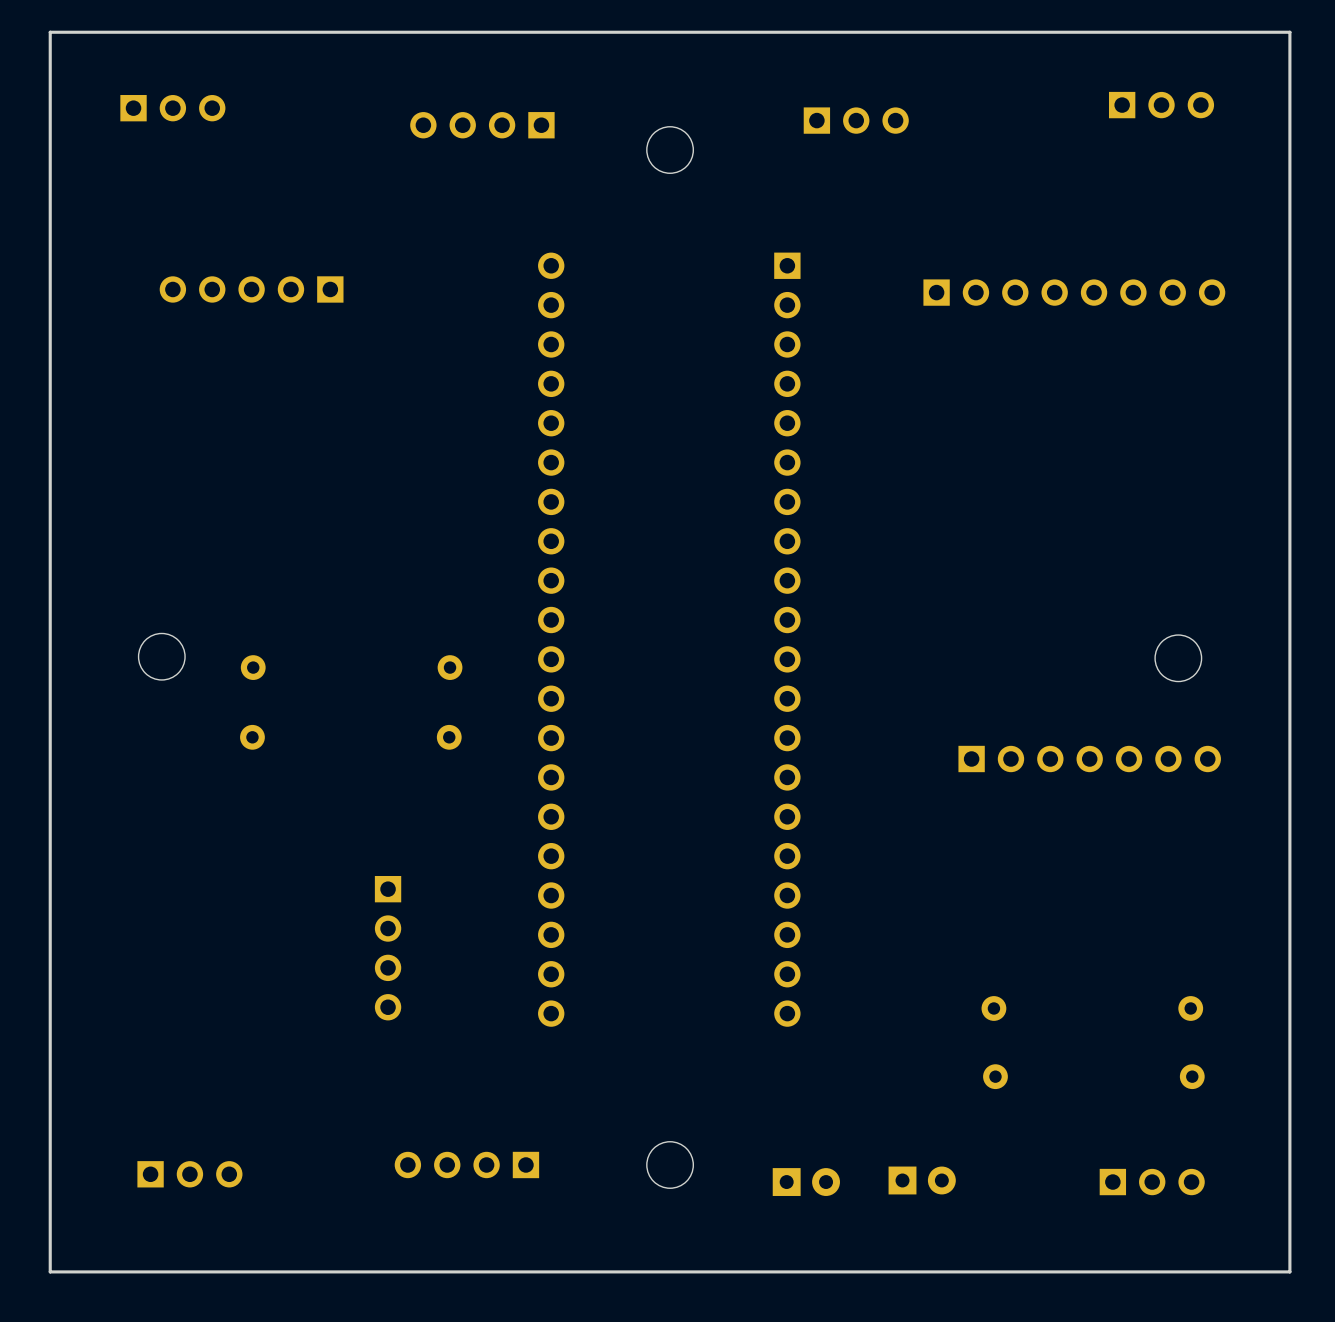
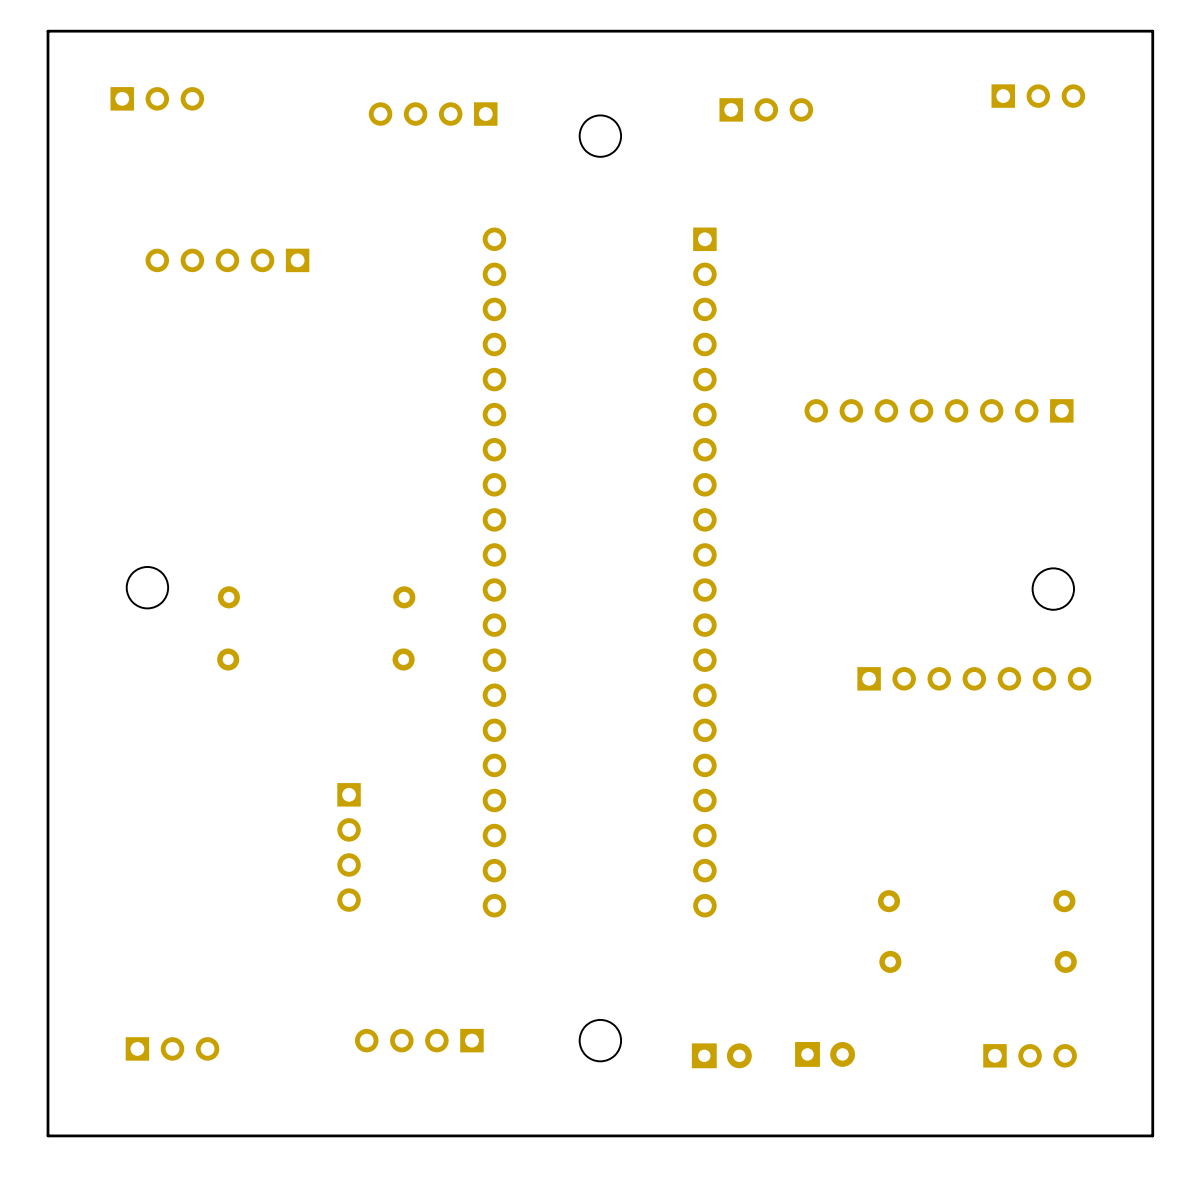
part rotation: 0° (1074, 292) -> 180° (939, 410)

